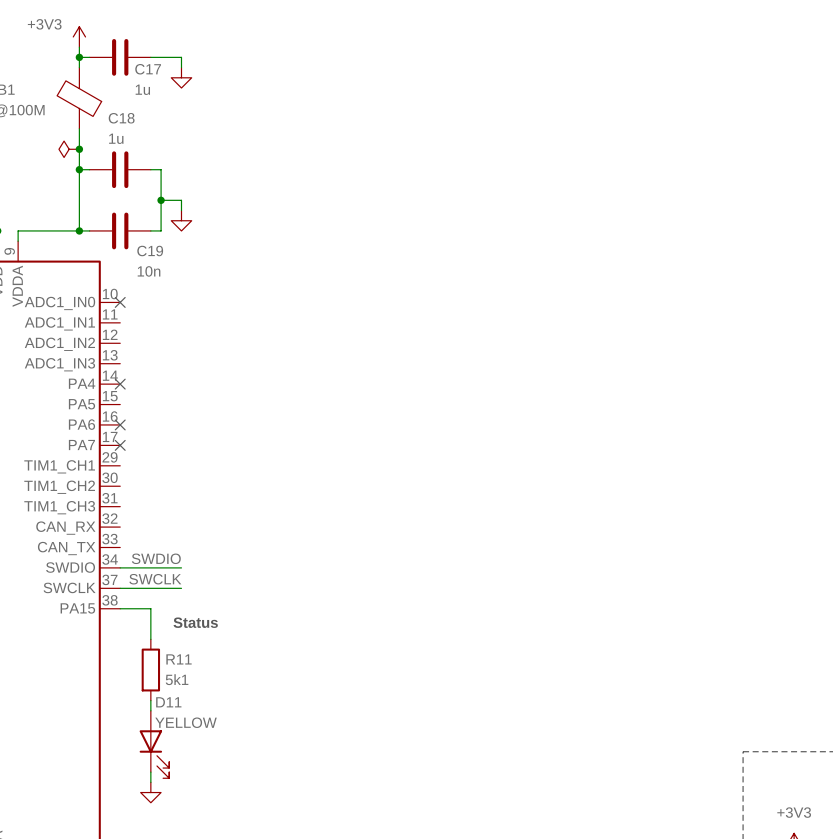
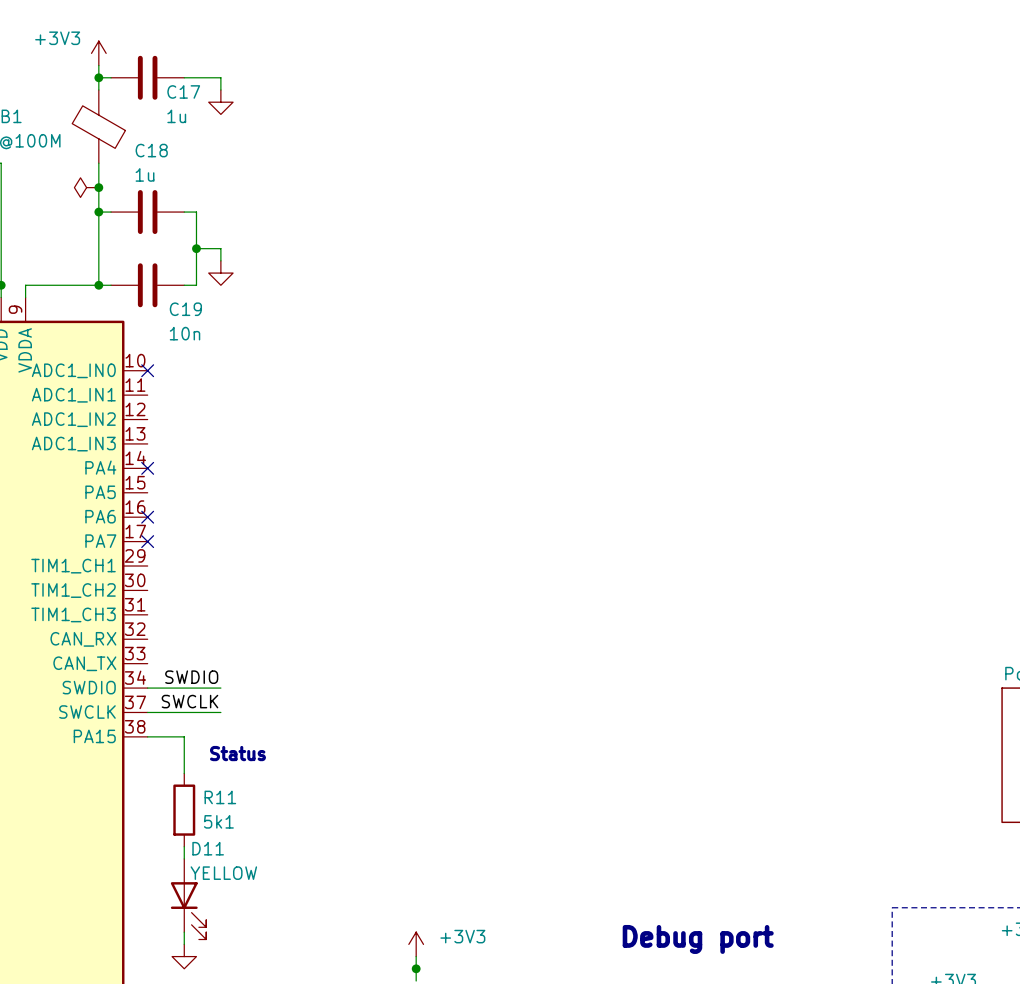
text: none -> Debug port (698, 939)
power symbol: none -> +3V3 (416, 944)
wire: none -> (416, 956) (416, 980)
junction: none -> (416, 968)

